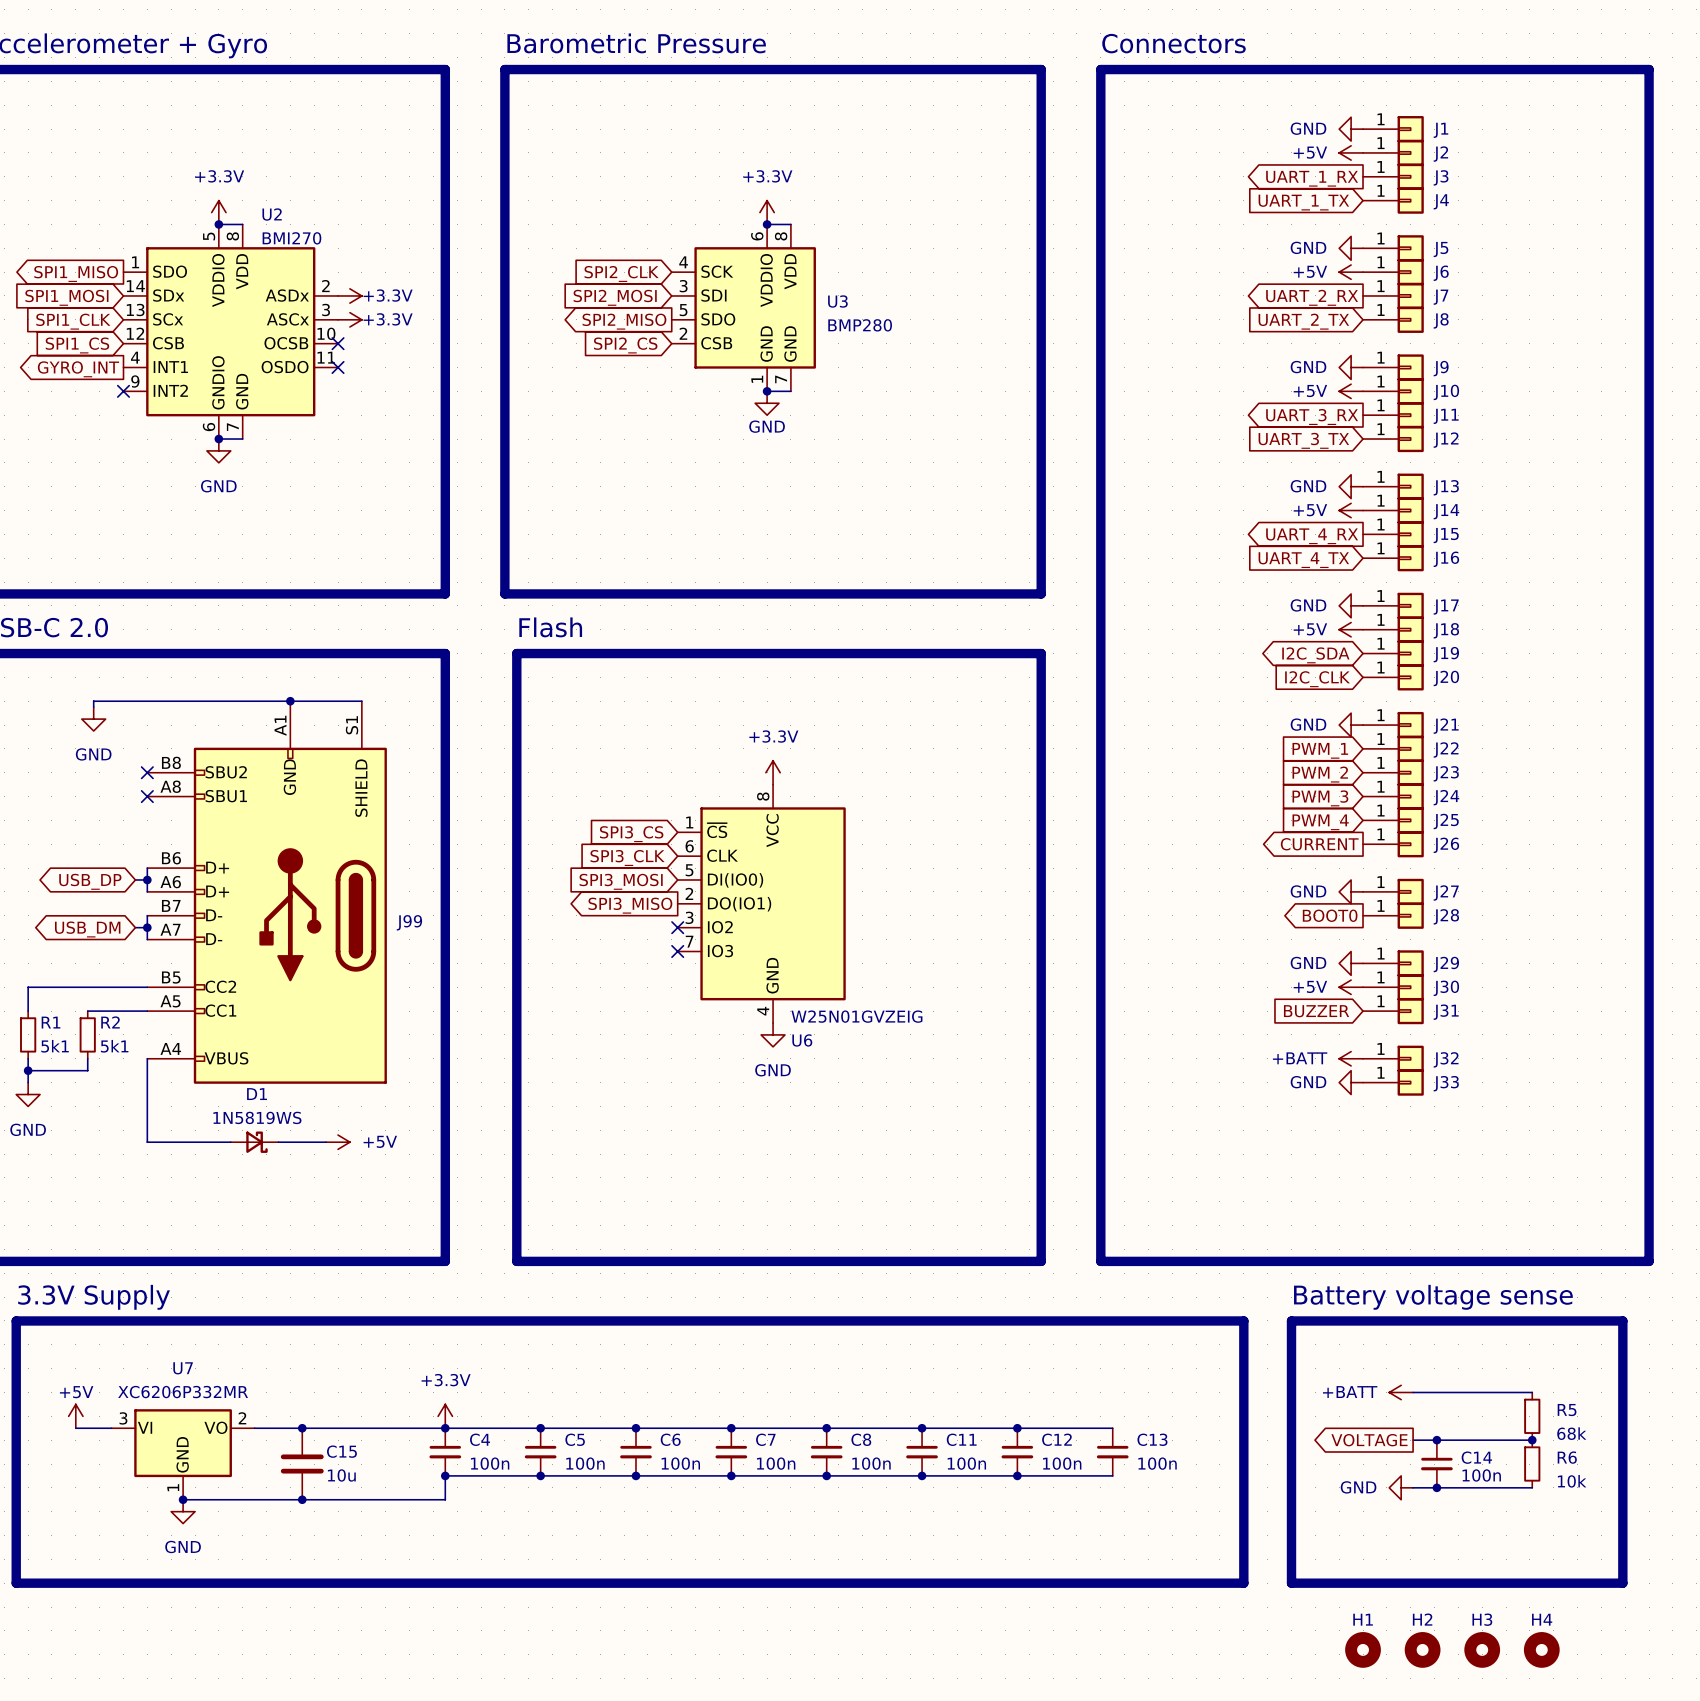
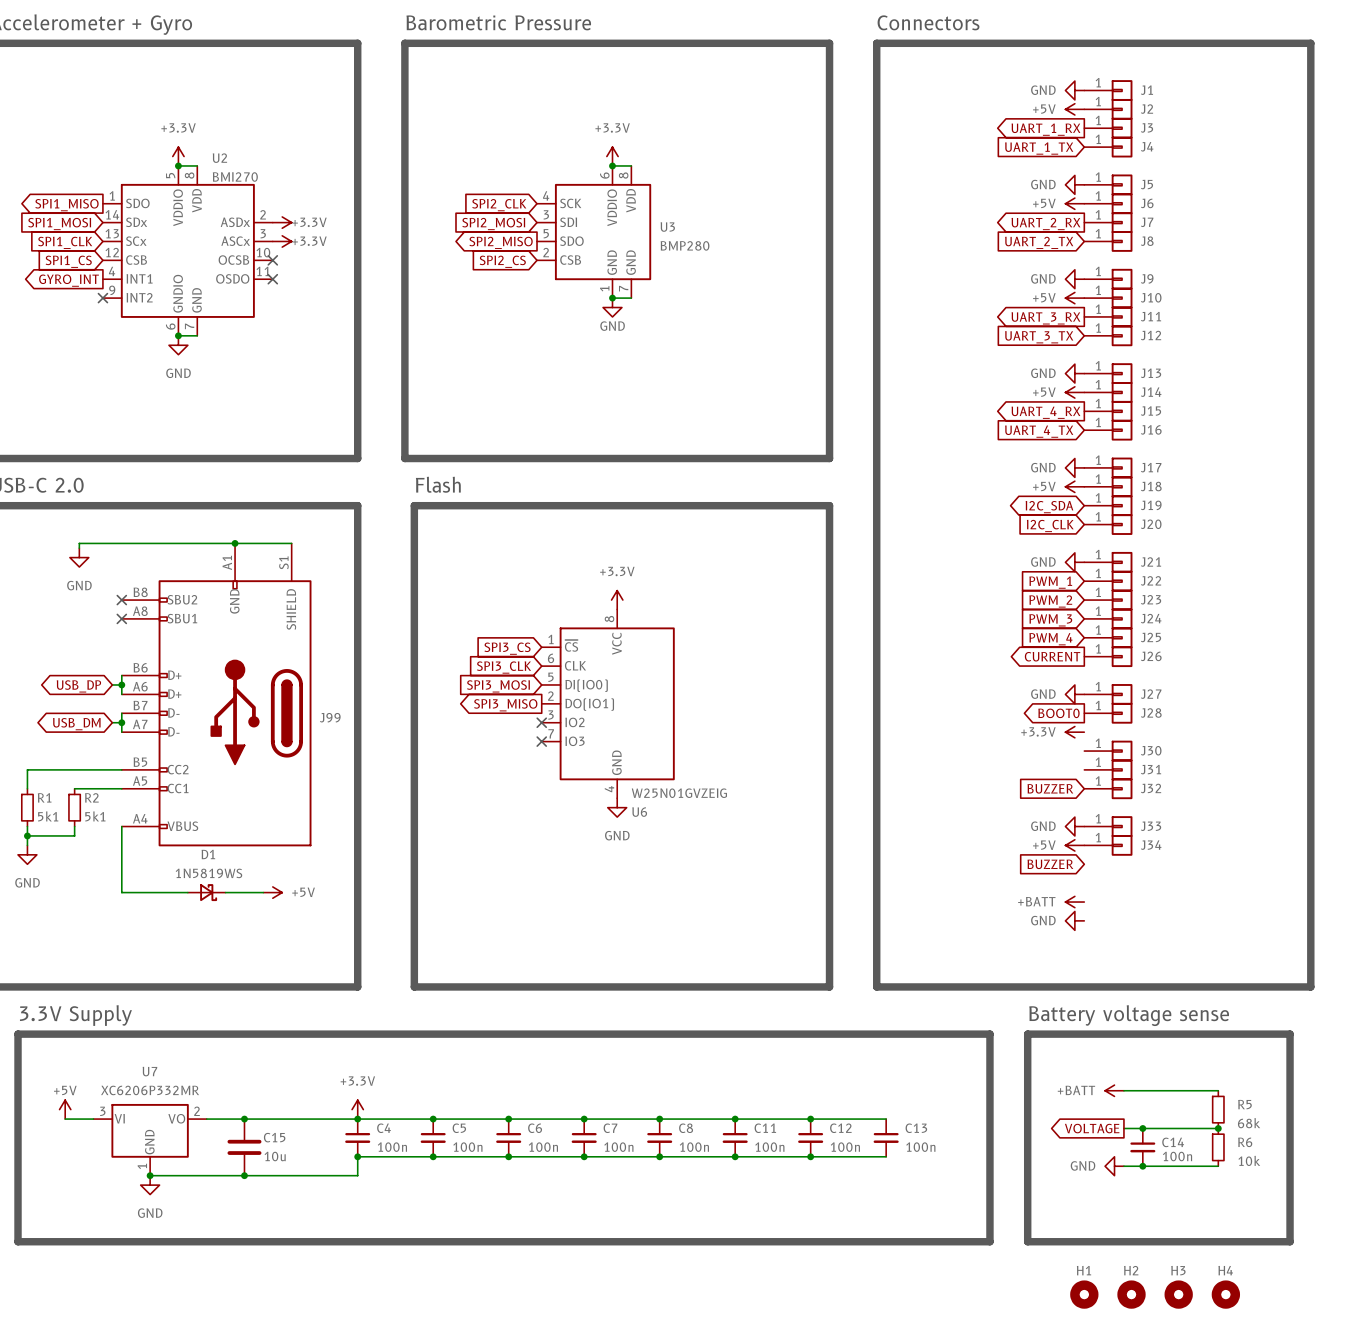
power symbol: none -> +3.3V (1074, 732)
power symbol position: GND (1351, 963) -> GND (1074, 920)
J29 name: J29 (1446, 964) -> J30 (1151, 750)
power symbol: +5V (1351, 987) -> none
J30 name: J30 (1446, 988) -> J31 (1151, 769)
J31 name: J31 (1446, 1012) -> J32 (1151, 788)
power symbol: +BATT (1351, 1058) -> GND (1074, 826)
J32 name: J32 (1446, 1059) -> J33 (1151, 826)
power symbol: GND (1351, 1082) -> +5V (1074, 845)
J33 name: J33 (1446, 1083) -> J34 (1151, 845)
global label: none -> BUZZER (1050, 864)
power symbol: none -> +BATT (1074, 902)

